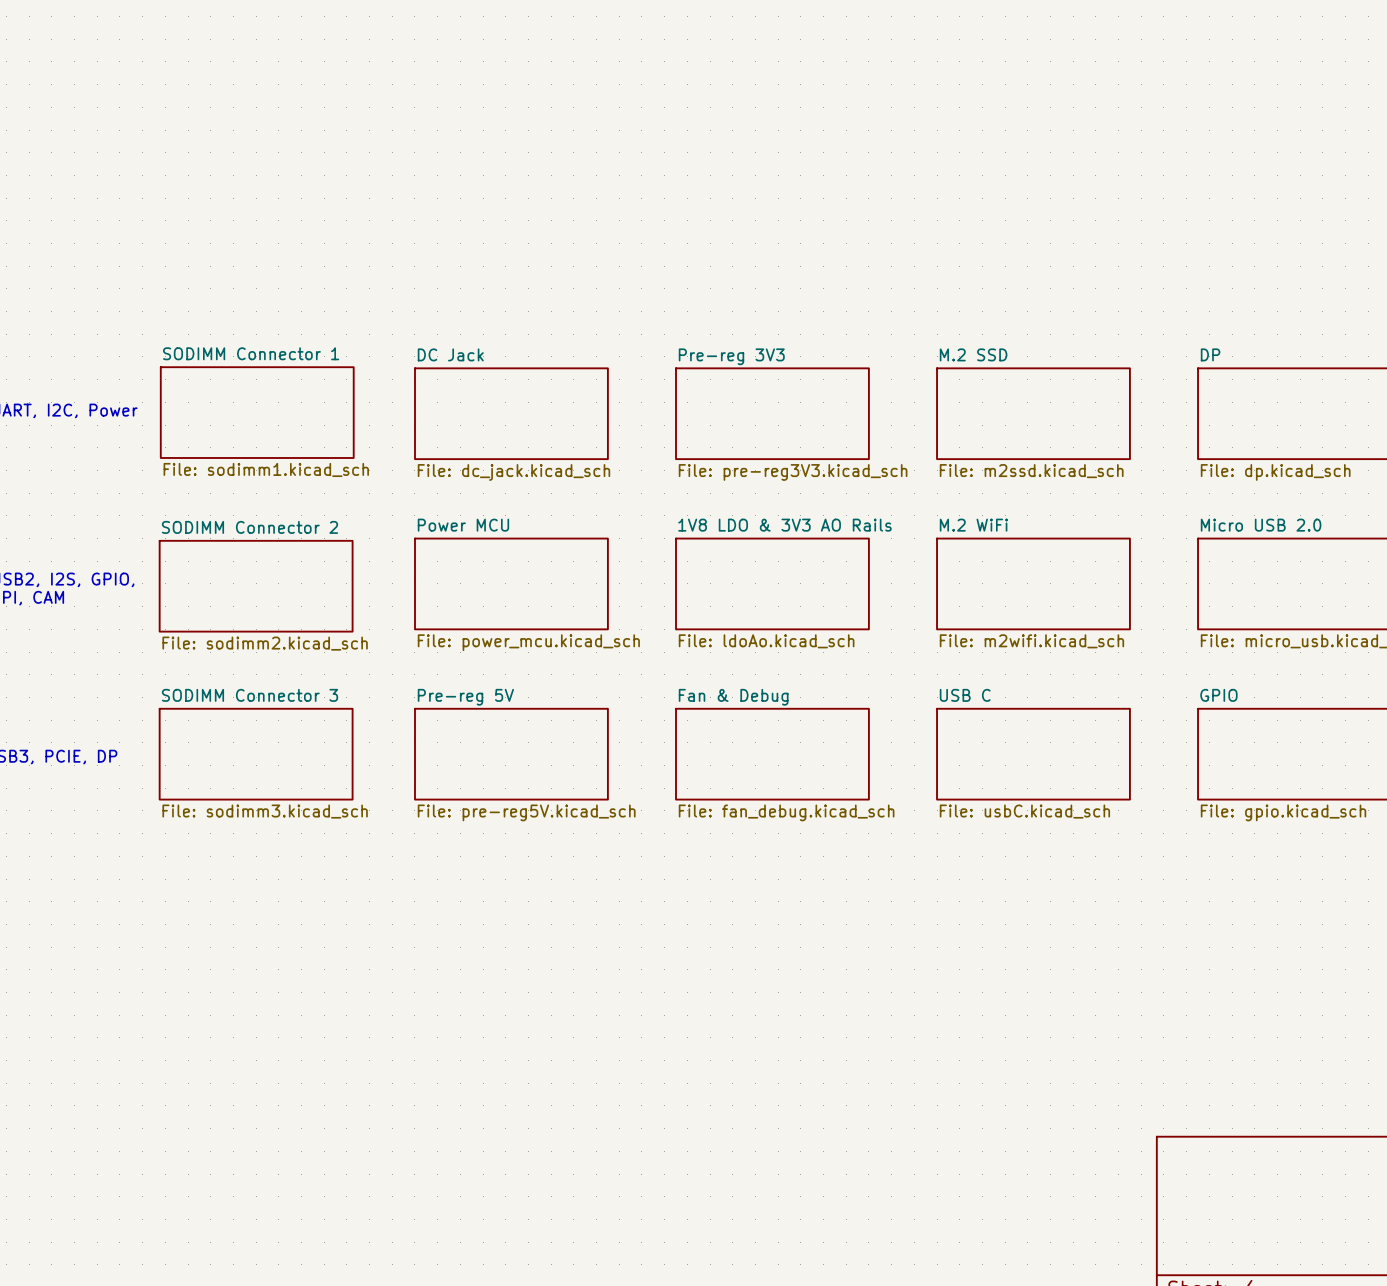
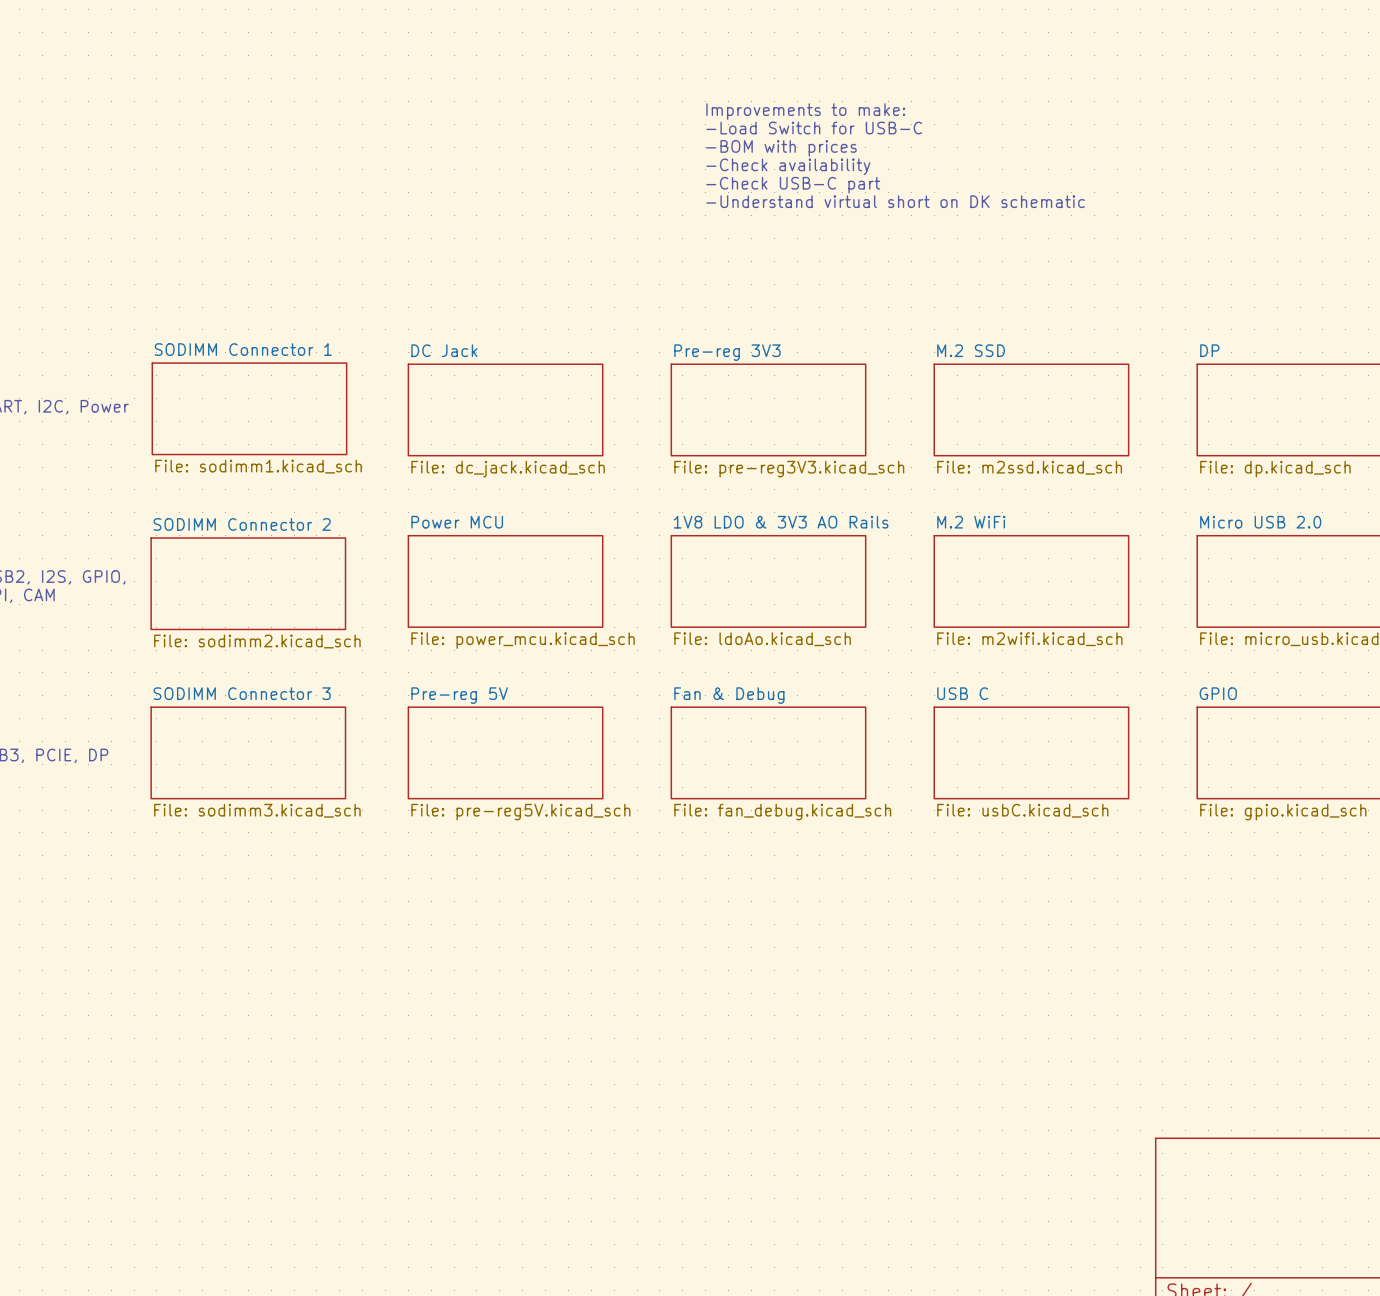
text: none -> Improvements to make: (805, 111)
text: none -> -Load Switch for USB-C (814, 128)
text: none -> -BOM with prices (781, 148)
text: none -> -Check availability (788, 166)
text: none -> -Check USB-C part (793, 185)
text: none -> -Understand virtual short on DK schematic (895, 201)

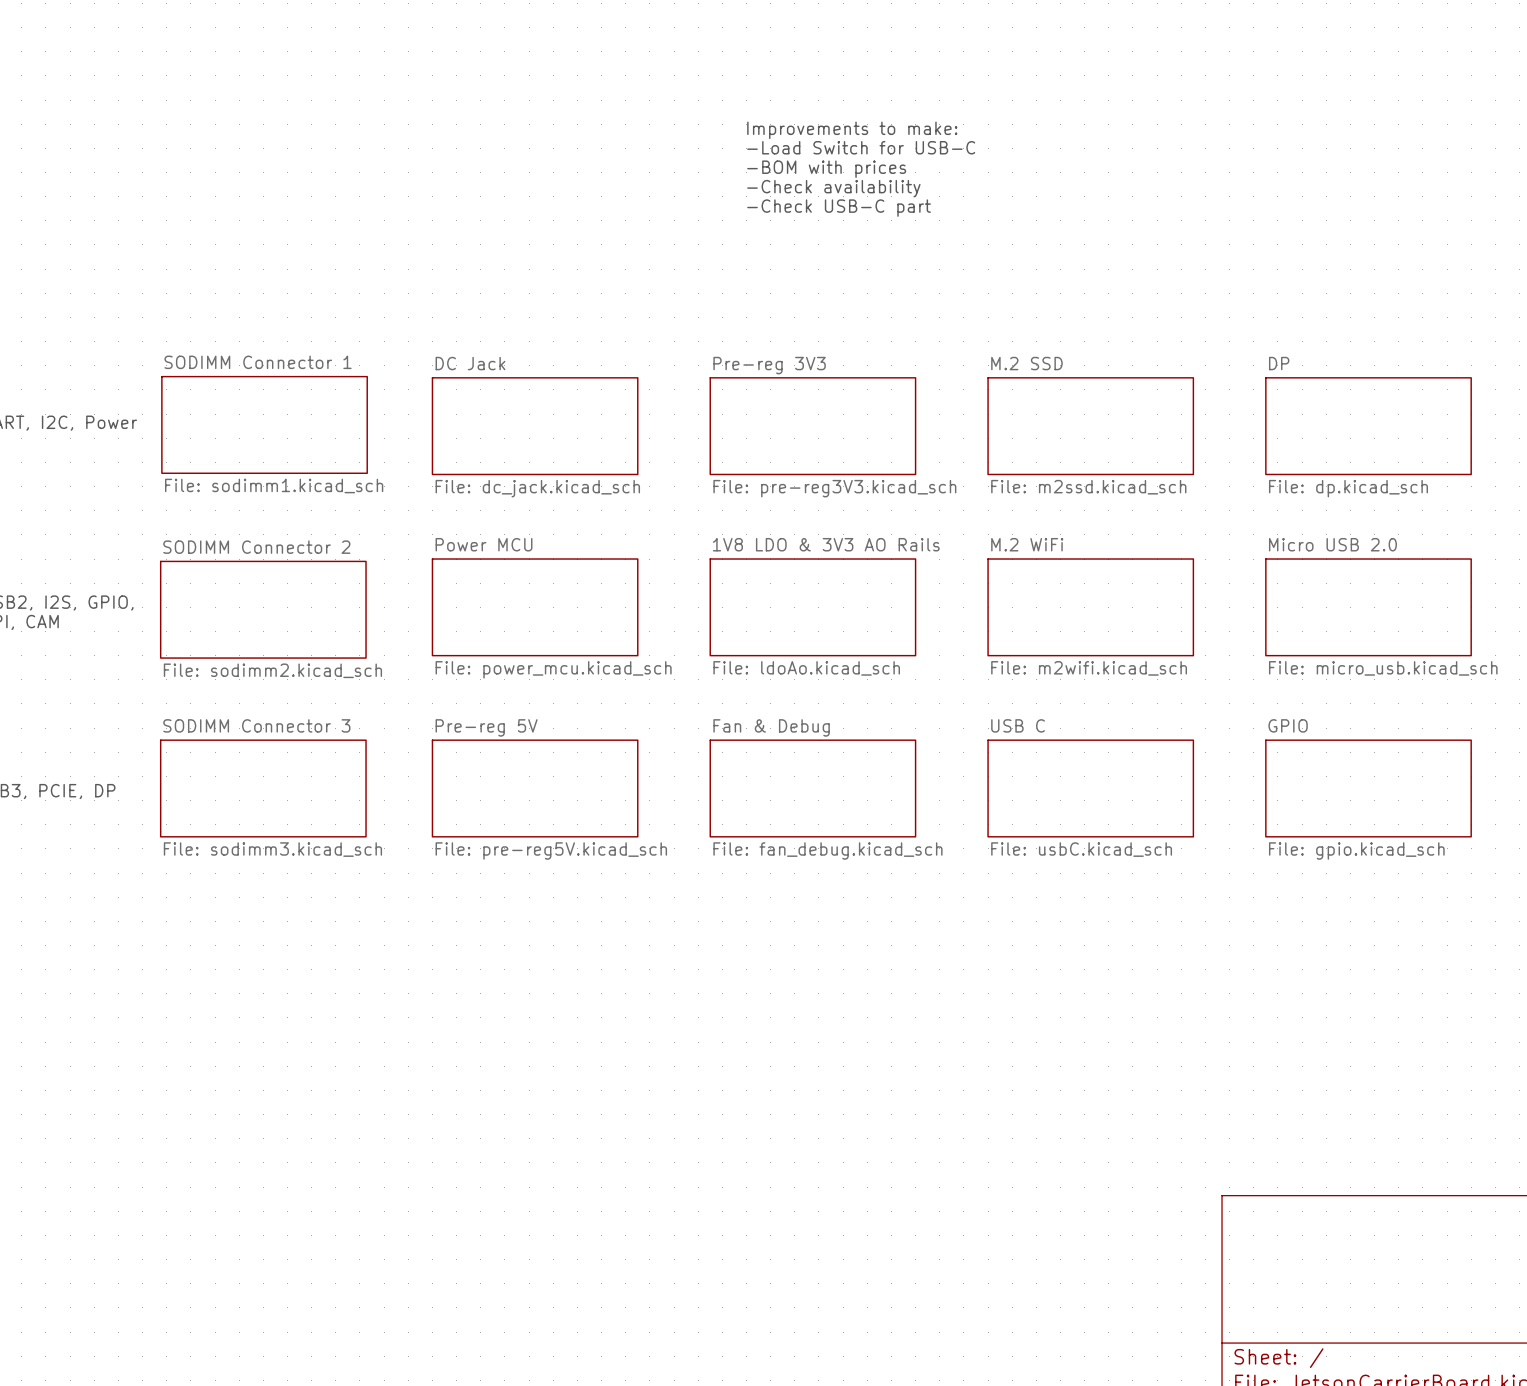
text: Improvements to make: (805, 111) -> none
text: -Load Switch for USB-C (814, 128) -> Improvements to make: (852, 130)
text: -BOM with prices (781, 148) -> -Load Switch for USB-C (861, 147)
text: -Check availability (788, 166) -> -BOM with prices (826, 169)
text: -Check USB-C part (793, 185) -> -Check availability (833, 188)
text: -Understand virtual short on DK schematic (895, 201) -> -Check USB-C part (839, 208)

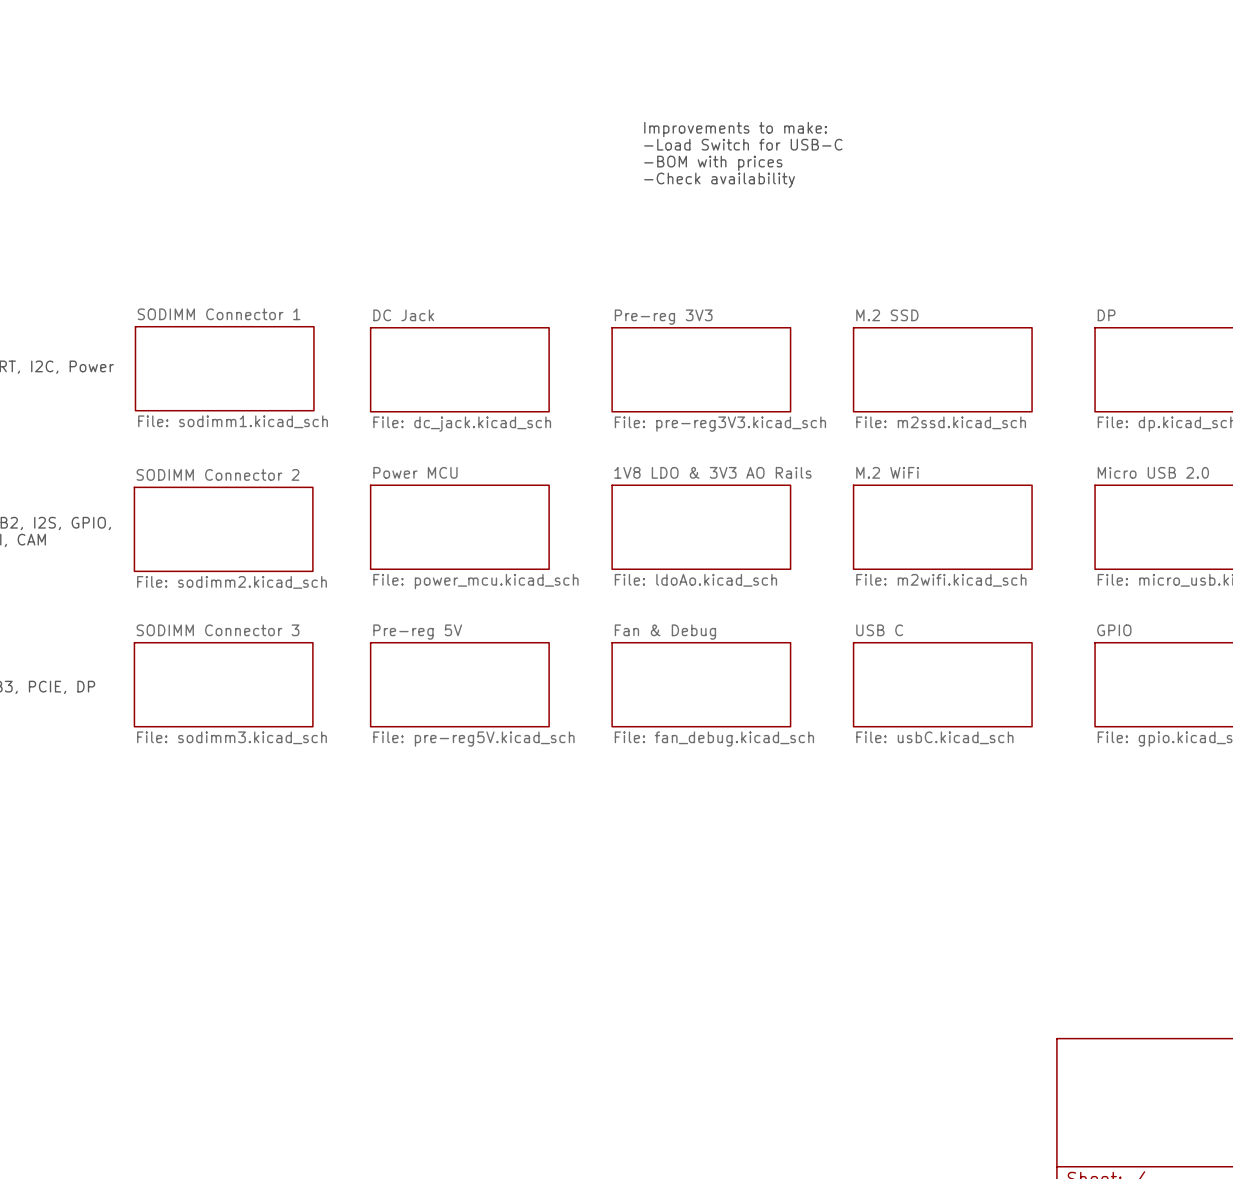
text: Improvements to make: (852, 130) -> none
text: -Load Switch for USB-C (861, 147) -> Improvements to make: (735, 129)
text: -BOM with prices (826, 169) -> -Load Switch for USB-C (743, 144)
text: -Check availability (833, 188) -> -BOM with prices (713, 163)
text: -Check USB-C part (839, 208) -> -Check availability (719, 180)

